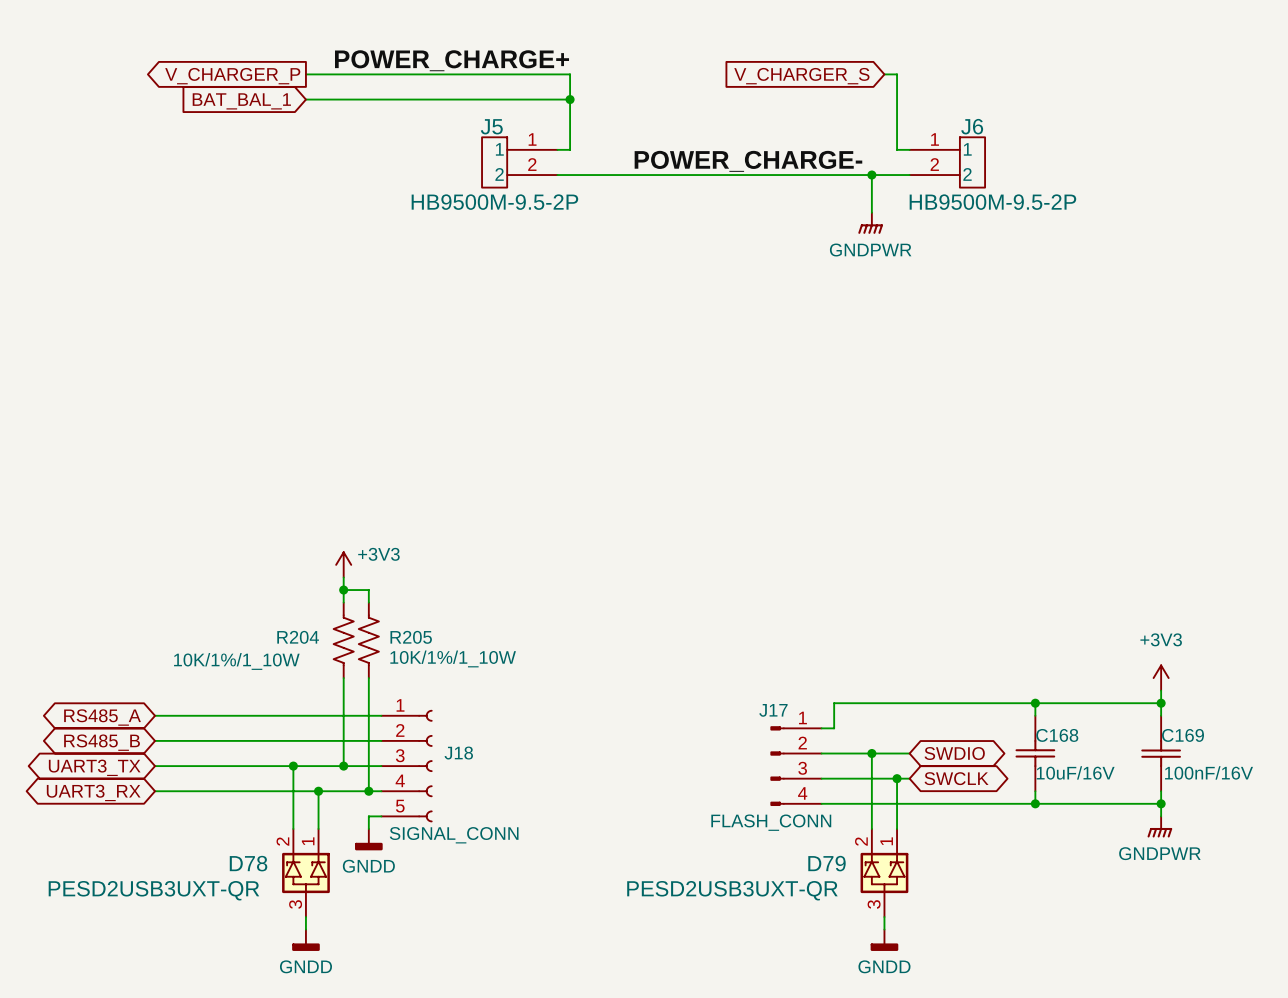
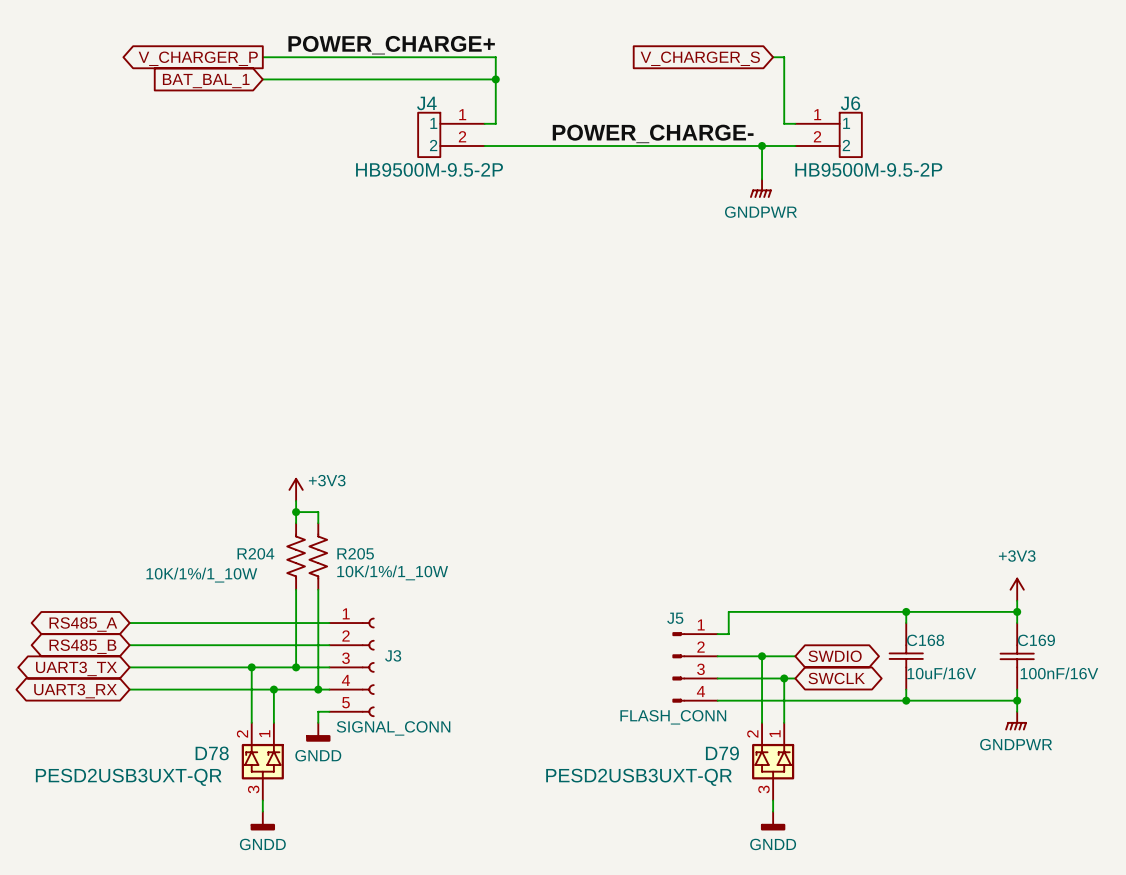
J5 name: J5 (491, 126) -> J4 (426, 103)
J17 name: J17 (773, 710) -> J5 (675, 618)
J18 name: J18 (458, 753) -> J3 (393, 655)

